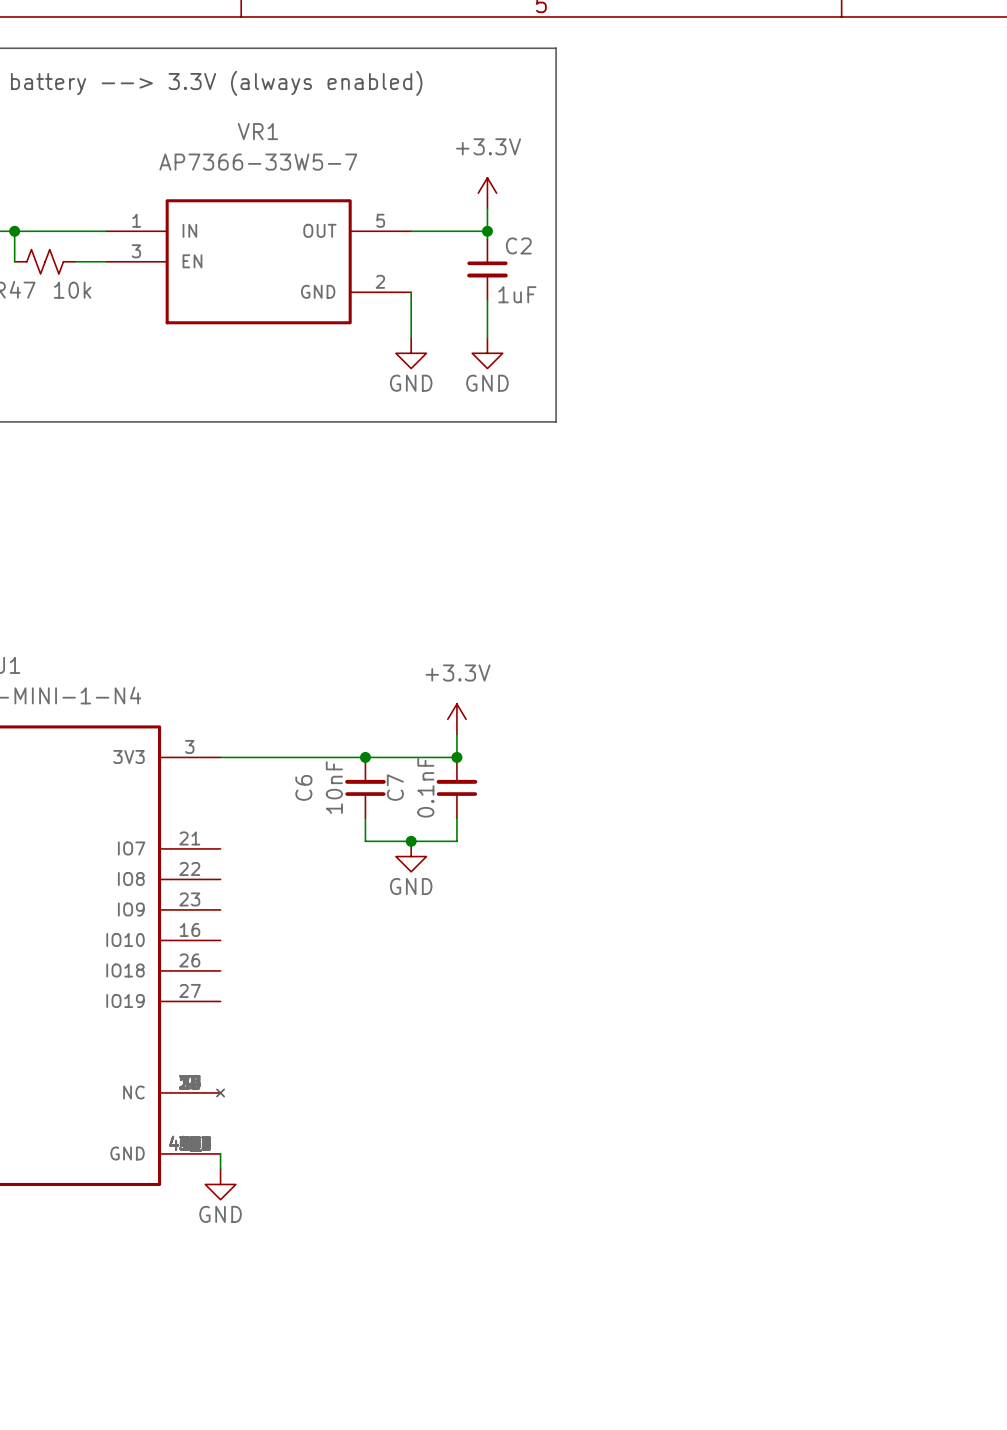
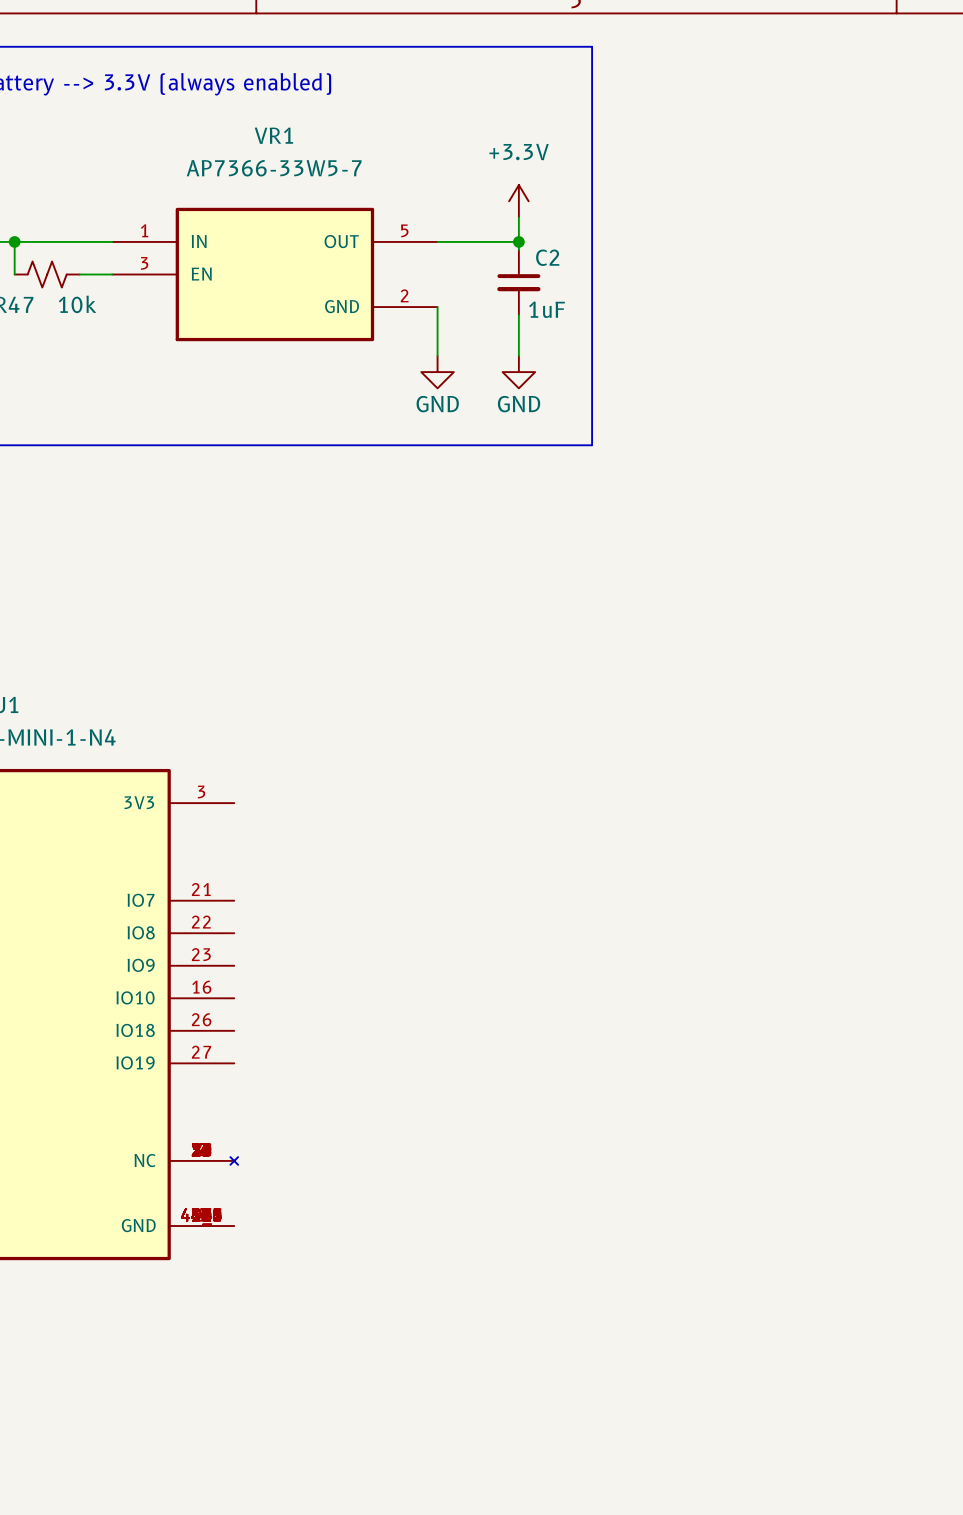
power symbol: +3.3V (456, 719) -> none
wire: (456, 734) (456, 757) (220, 757) -> none
junction: (365, 757) -> none
junction: (456, 757) -> none
C6: 10nF (365, 787) -> none
C7: 0.1nF (456, 787) -> none
wire: (365, 818) (365, 841) (456, 841) (456, 818) -> none
junction: (411, 841) -> none
power symbol: GND (411, 856) -> none
wire: (220, 1153) (220, 1169) -> none
power symbol: GND (220, 1184) -> none

